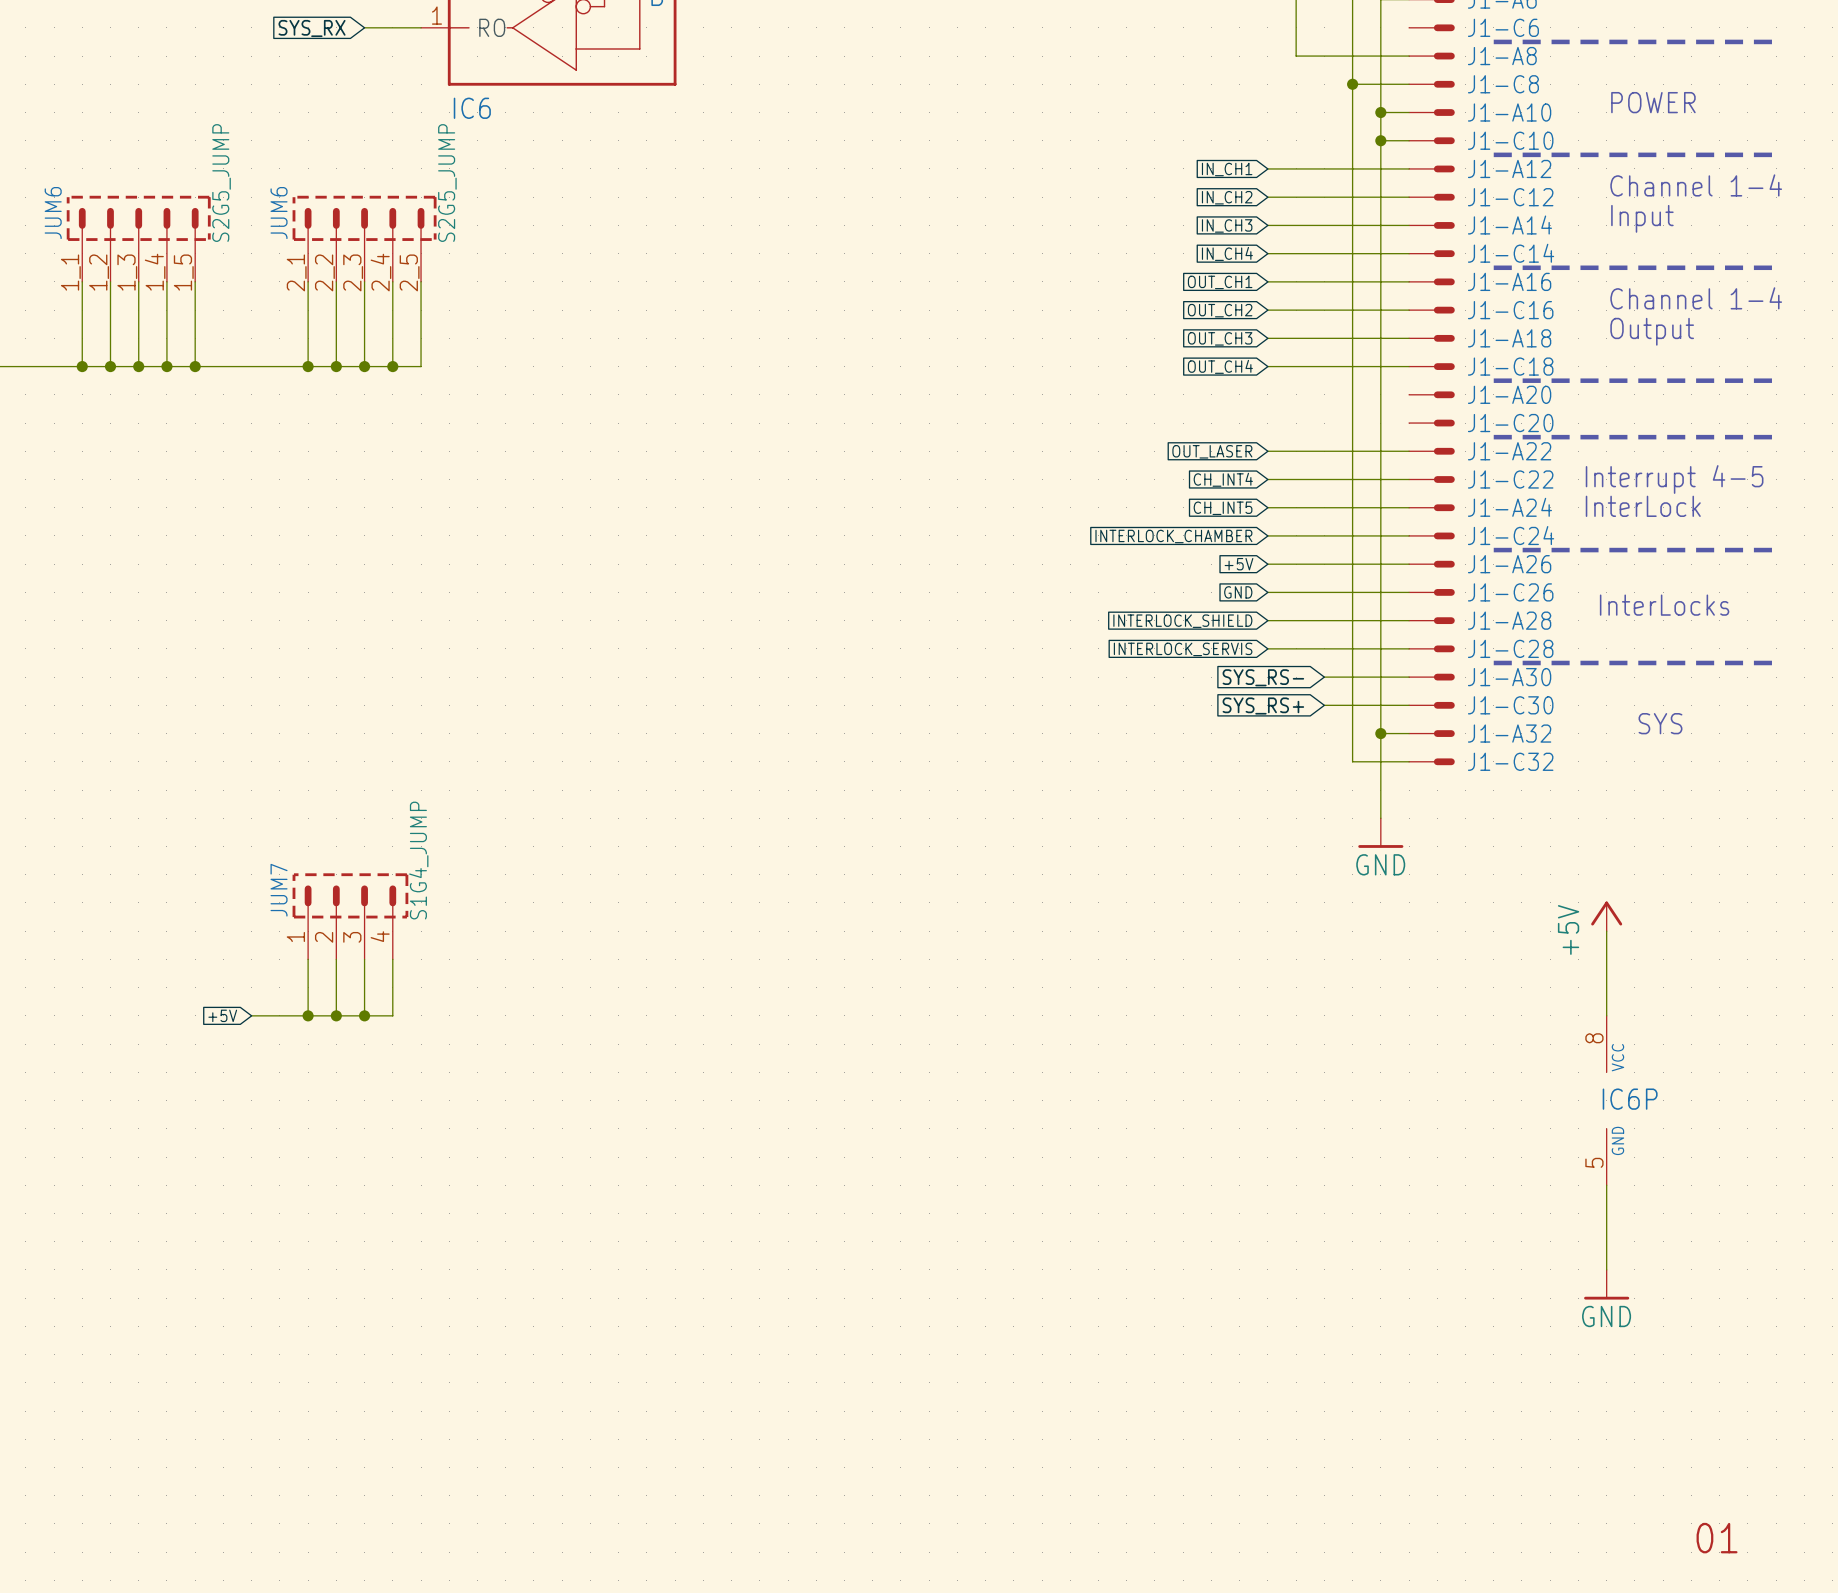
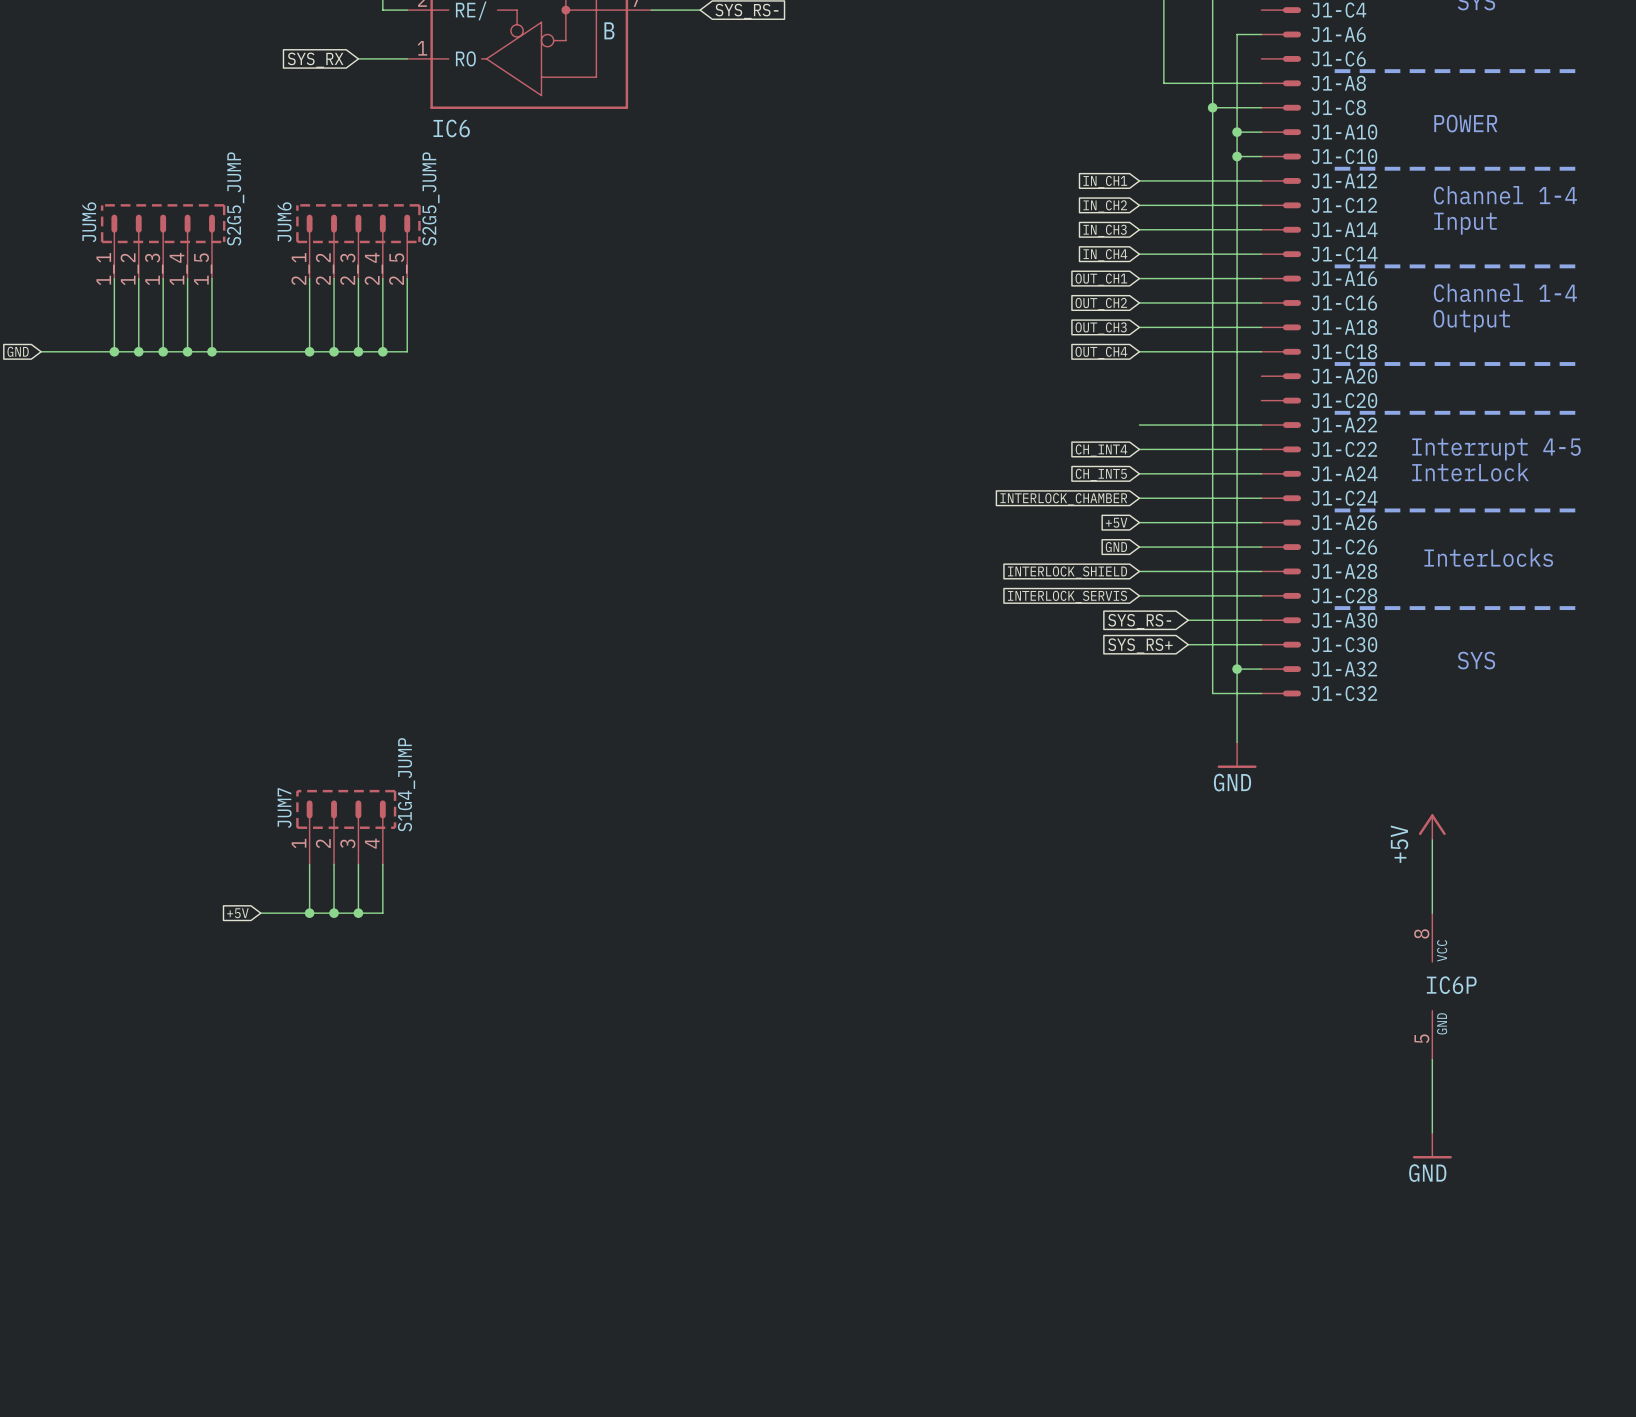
global label: OUT_LASER (1212, 451) -> none
text: 01 (1717, 1538) -> none

